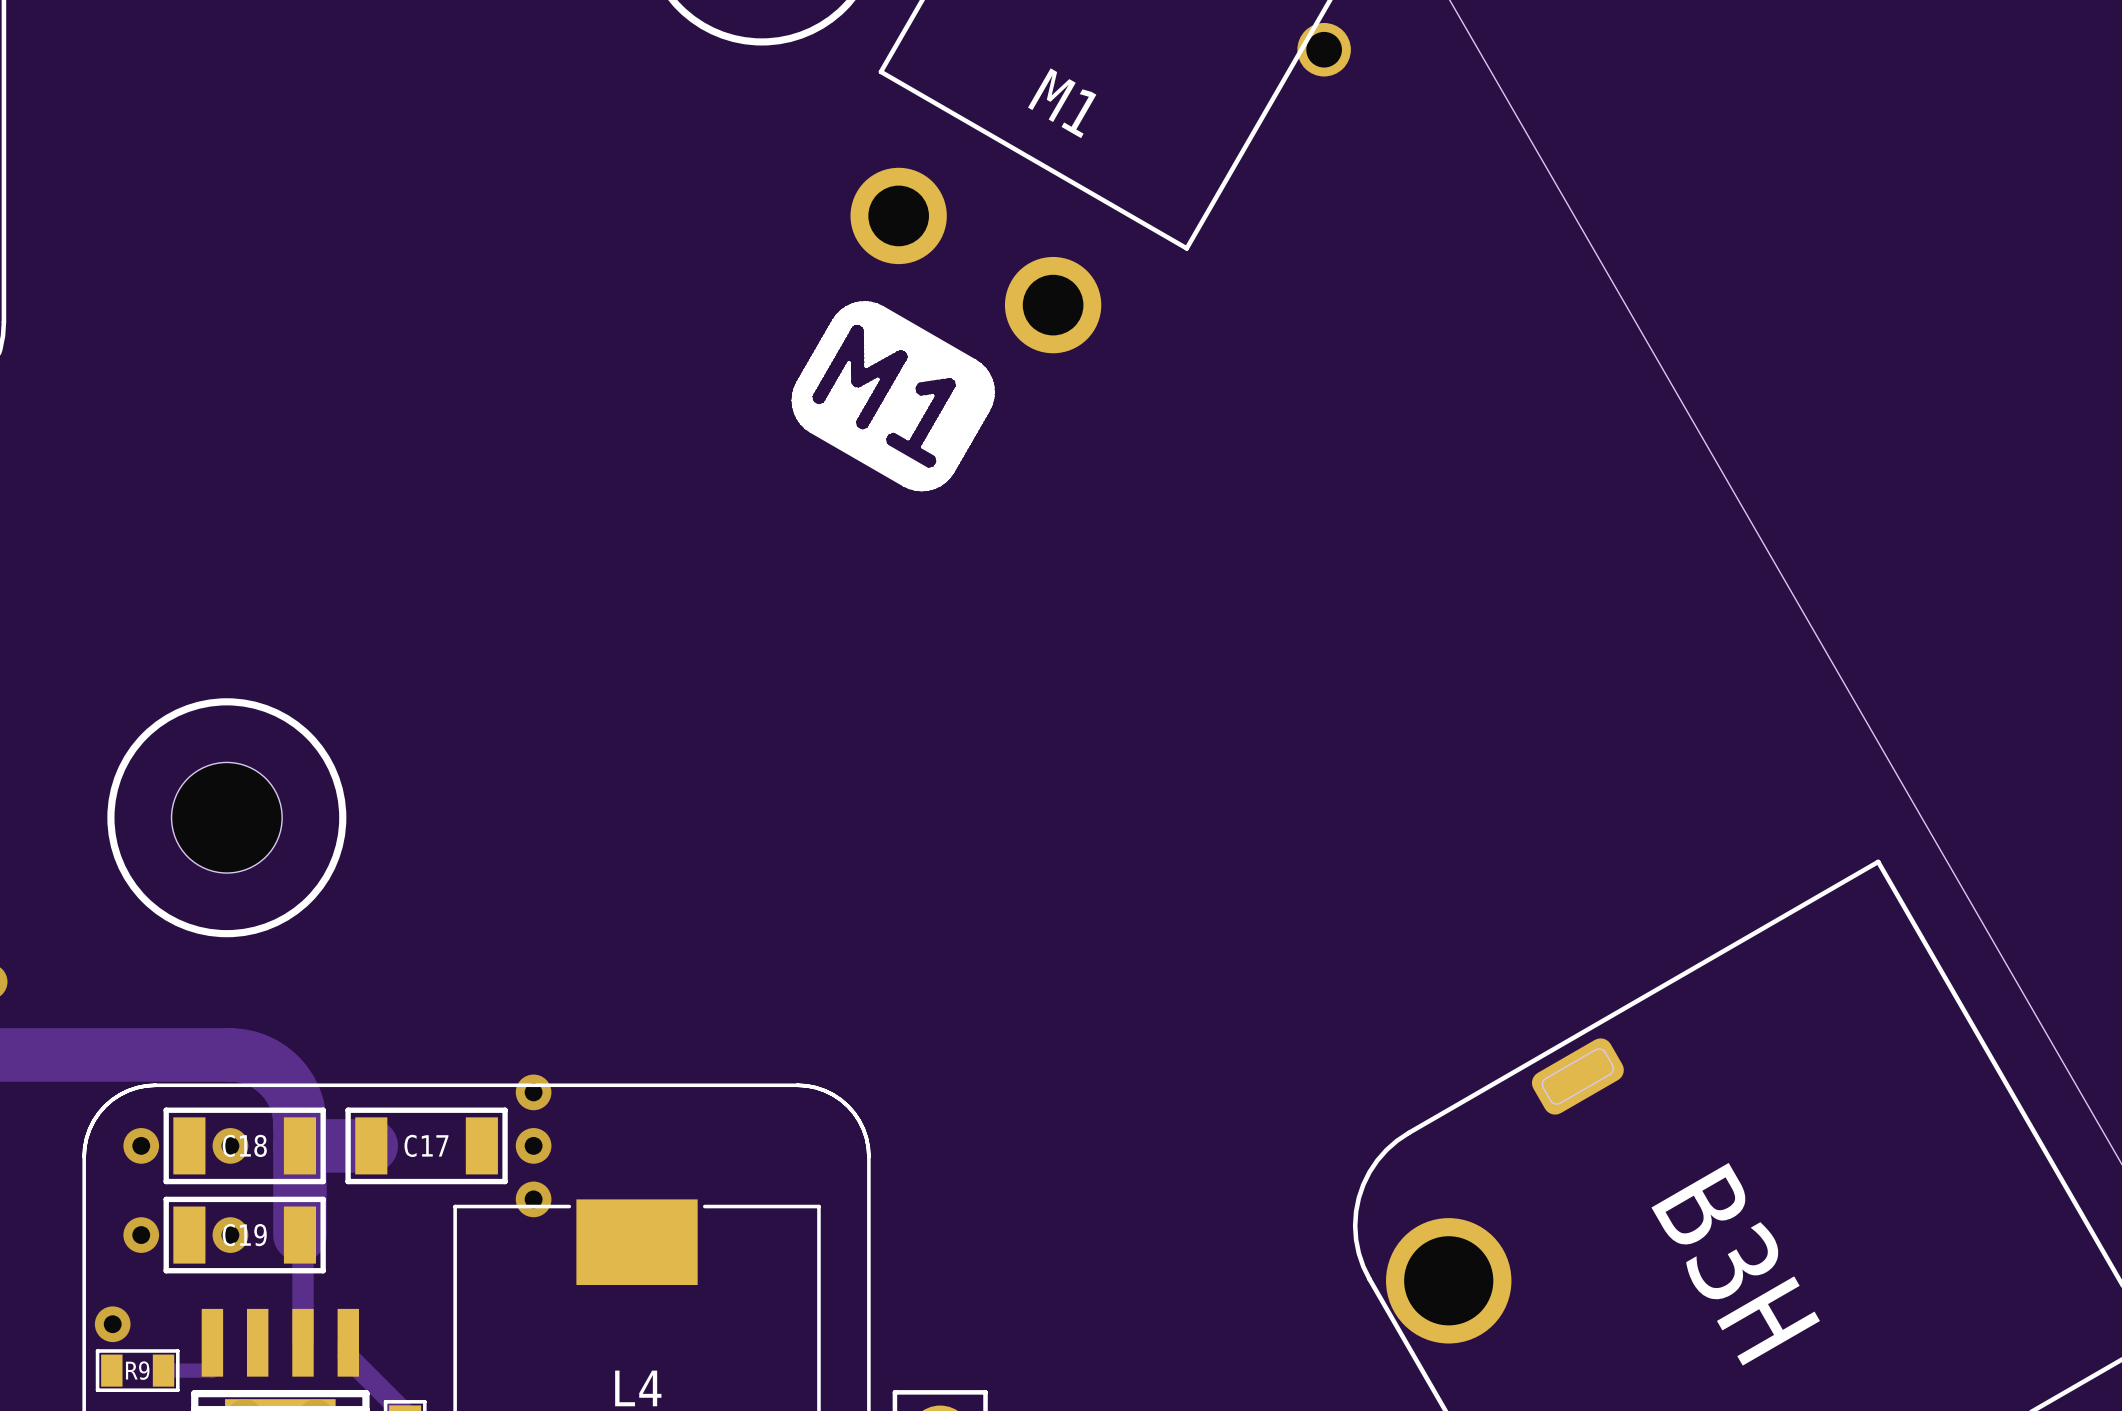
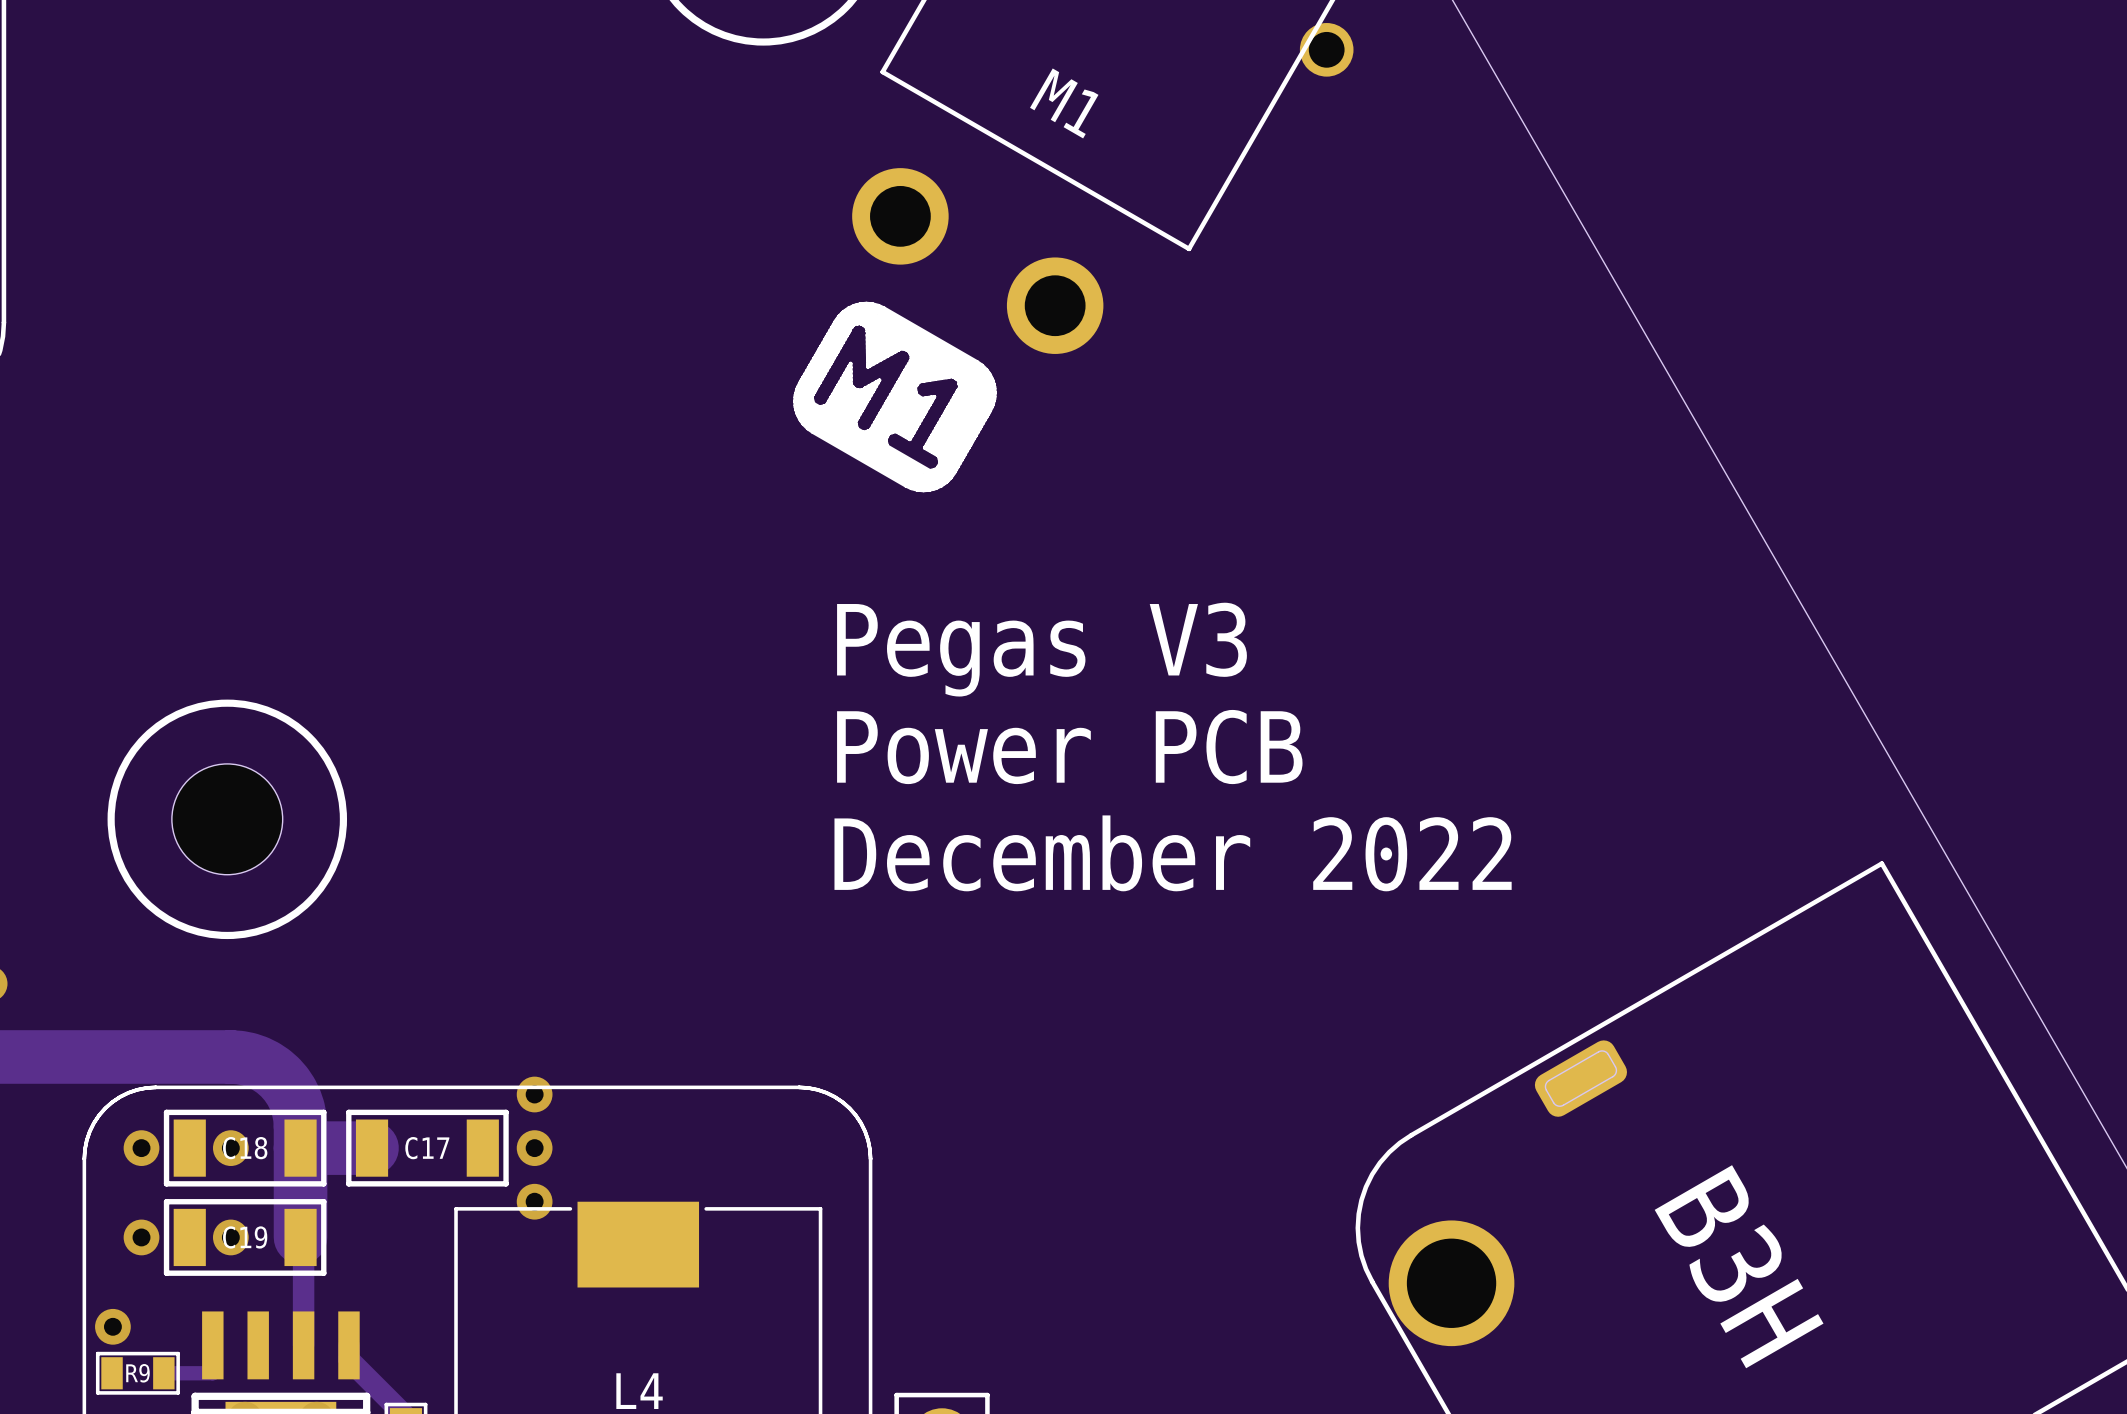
text: none -> Pegas V3 (1041, 649)
text: none -> Power PCB (1069, 747)
text: none -> December 2022 (1173, 853)

